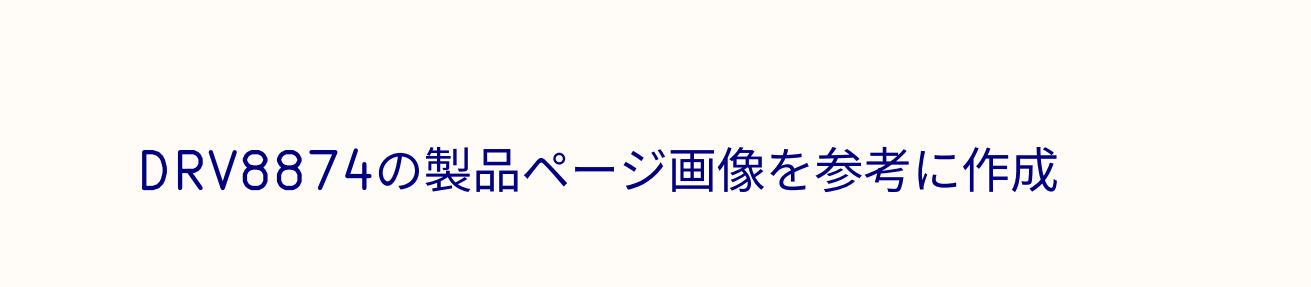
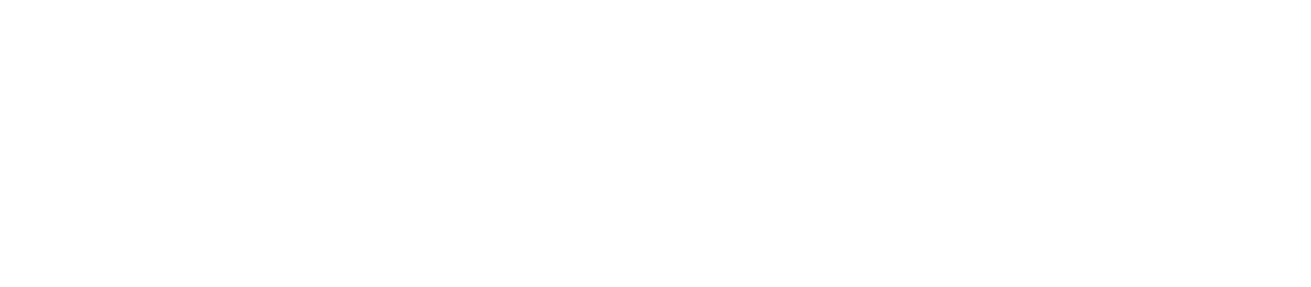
text: DRV8874の製品ページ画像を参考に作成 (600, 169) -> none

